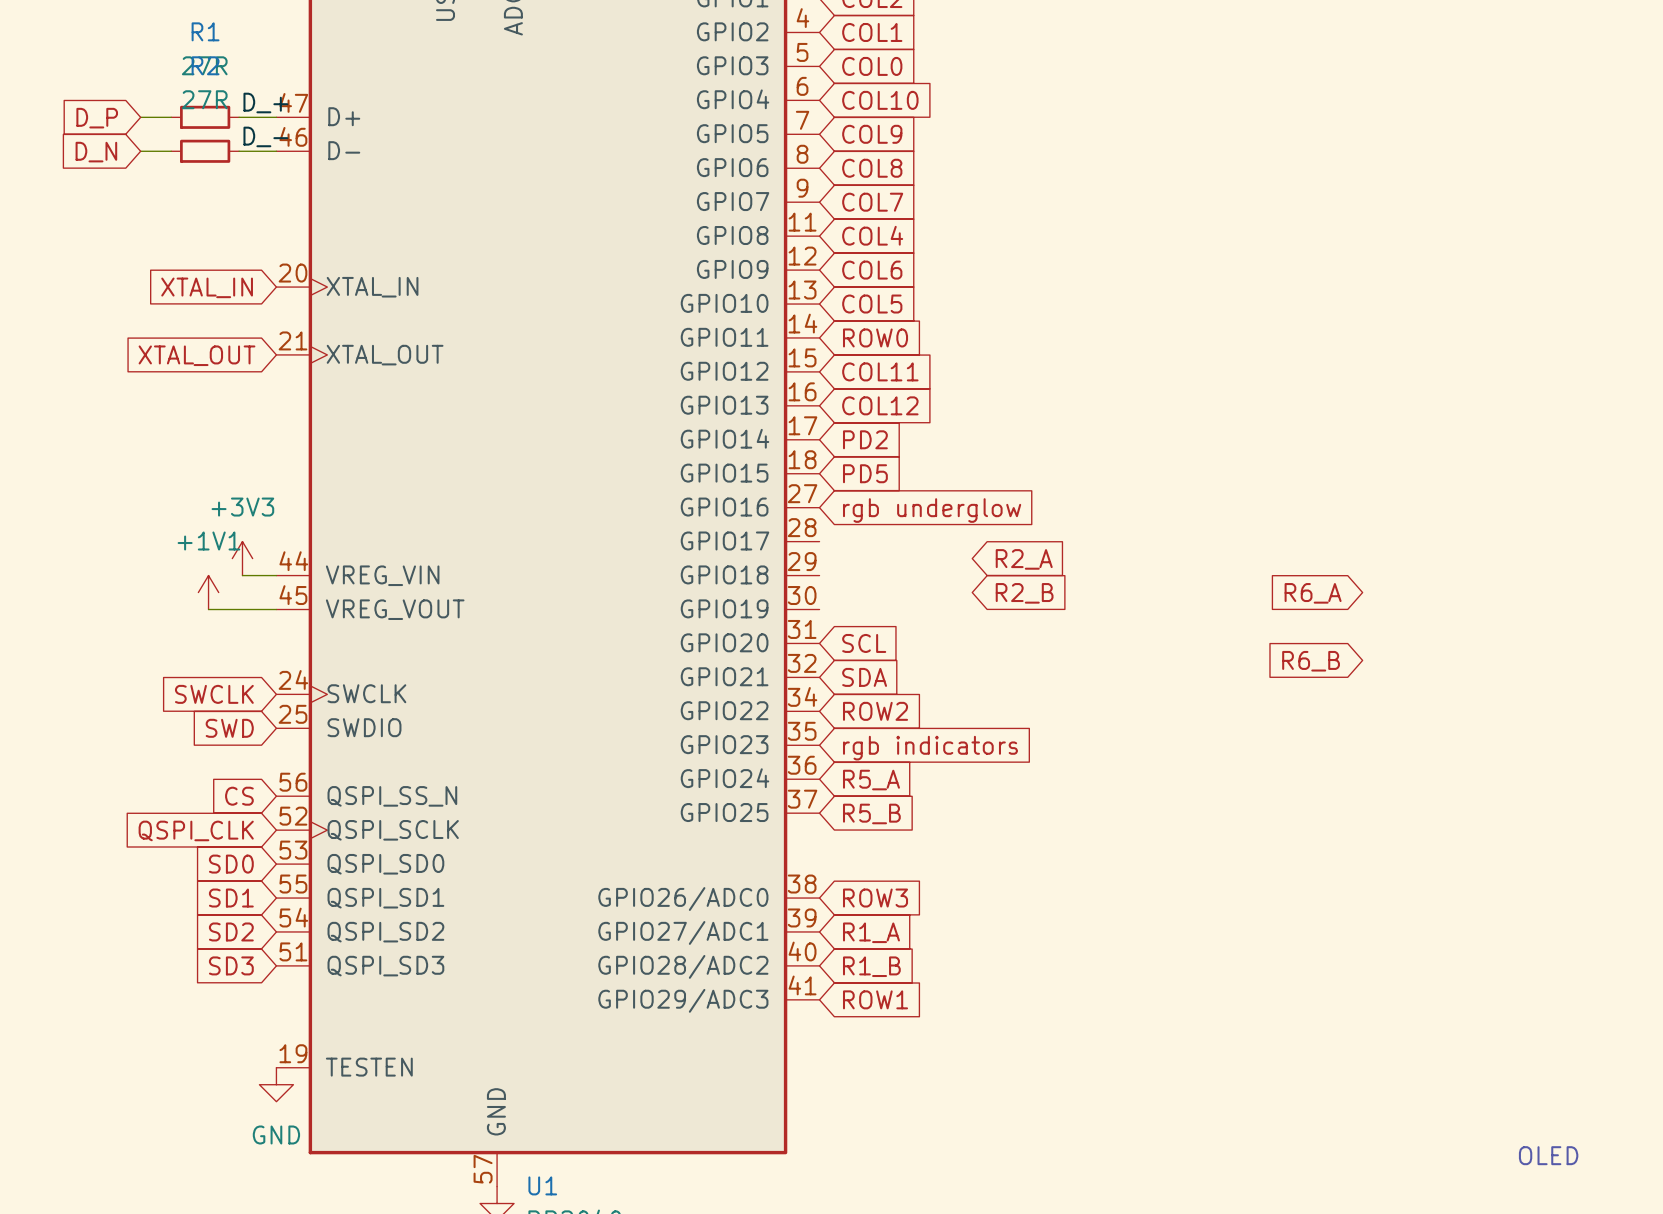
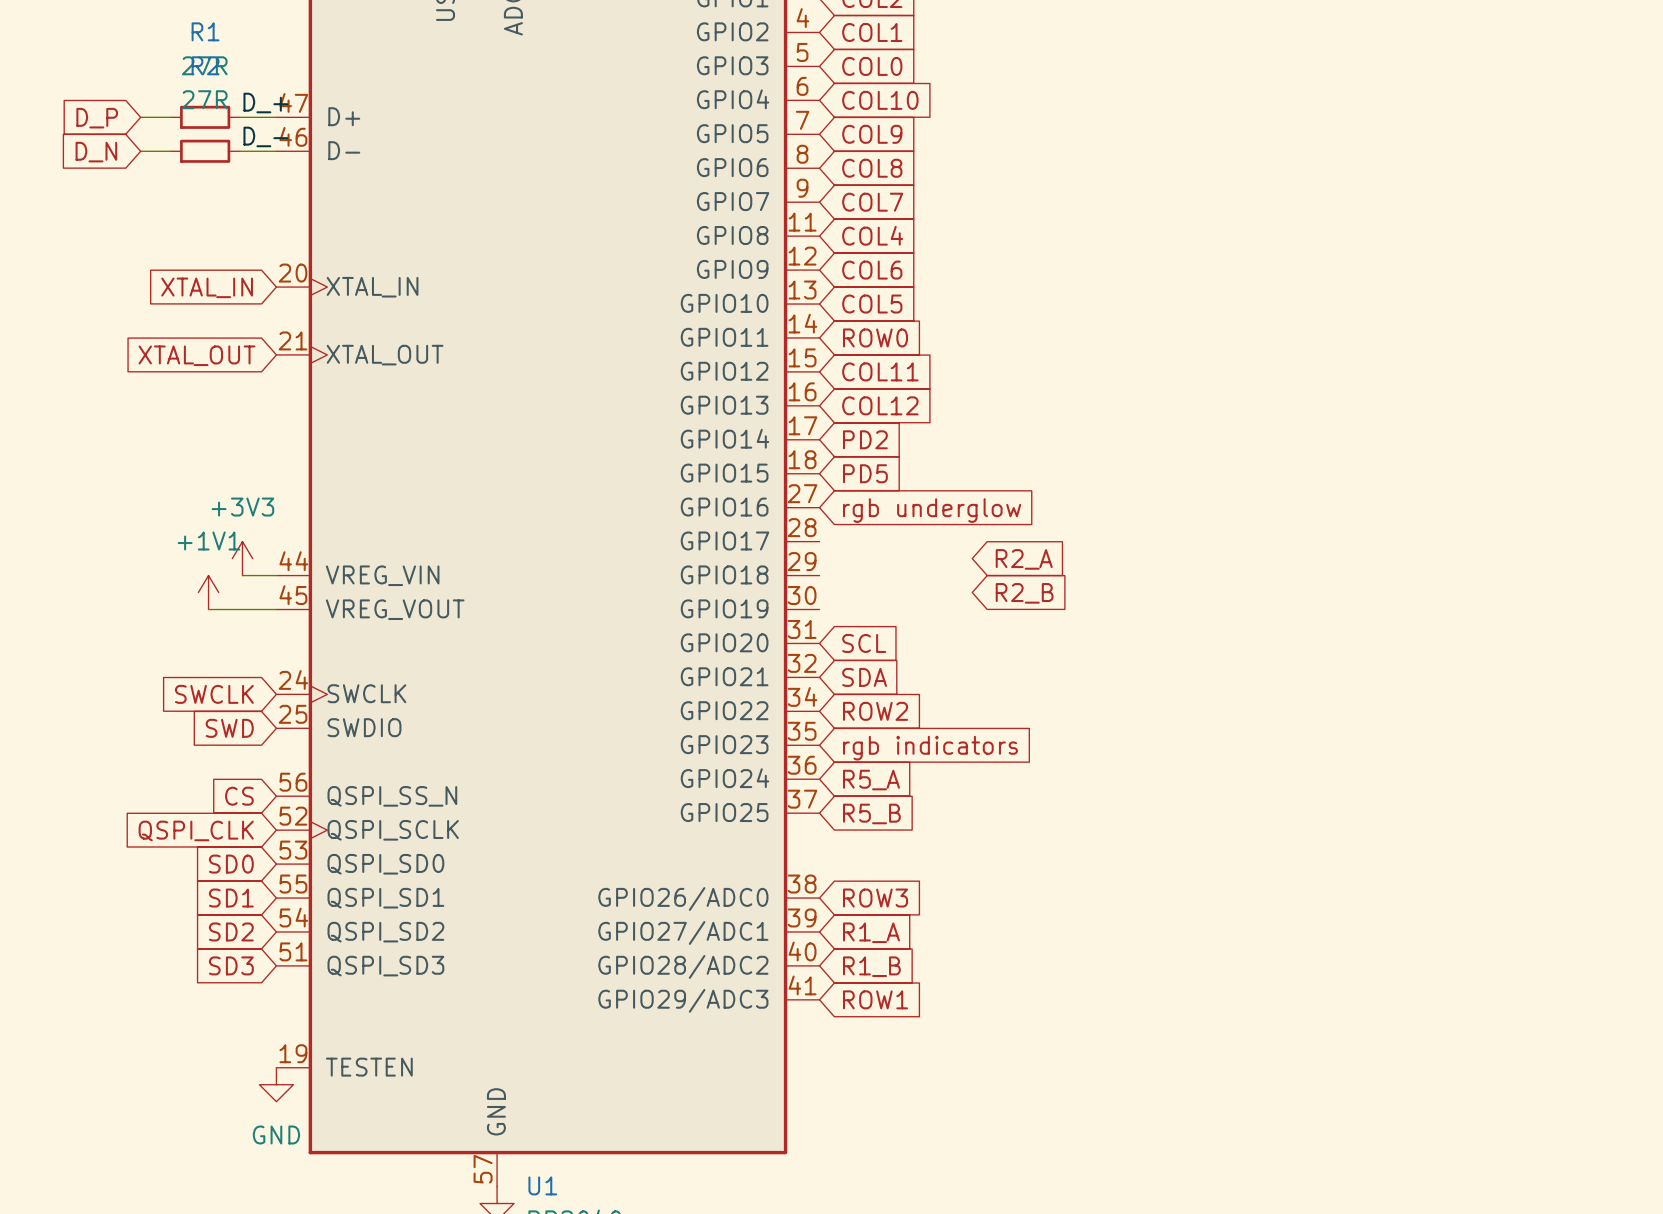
global label: R6_A (1313, 593) -> none
global label: R6_B (1311, 661) -> none
text: OLED (1548, 1155) -> none

